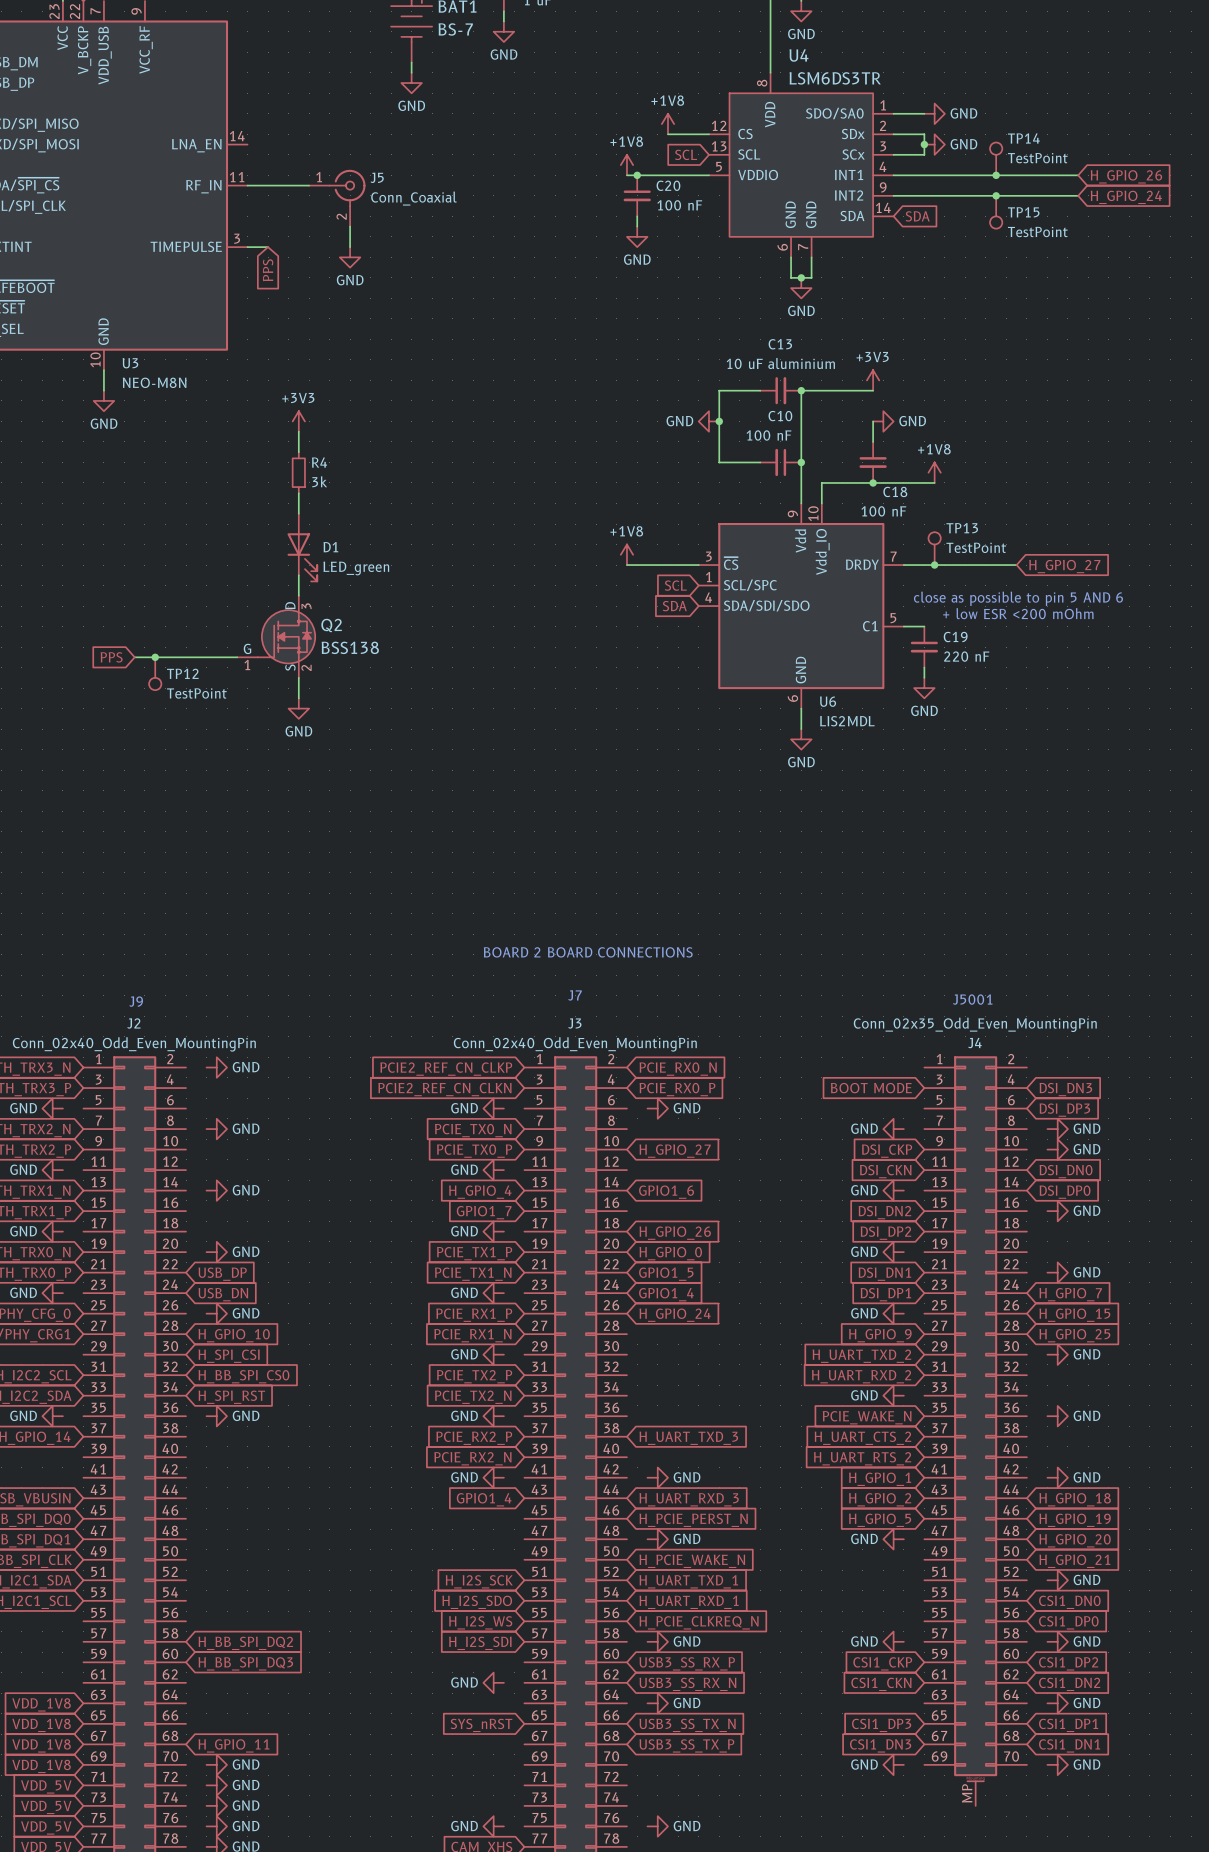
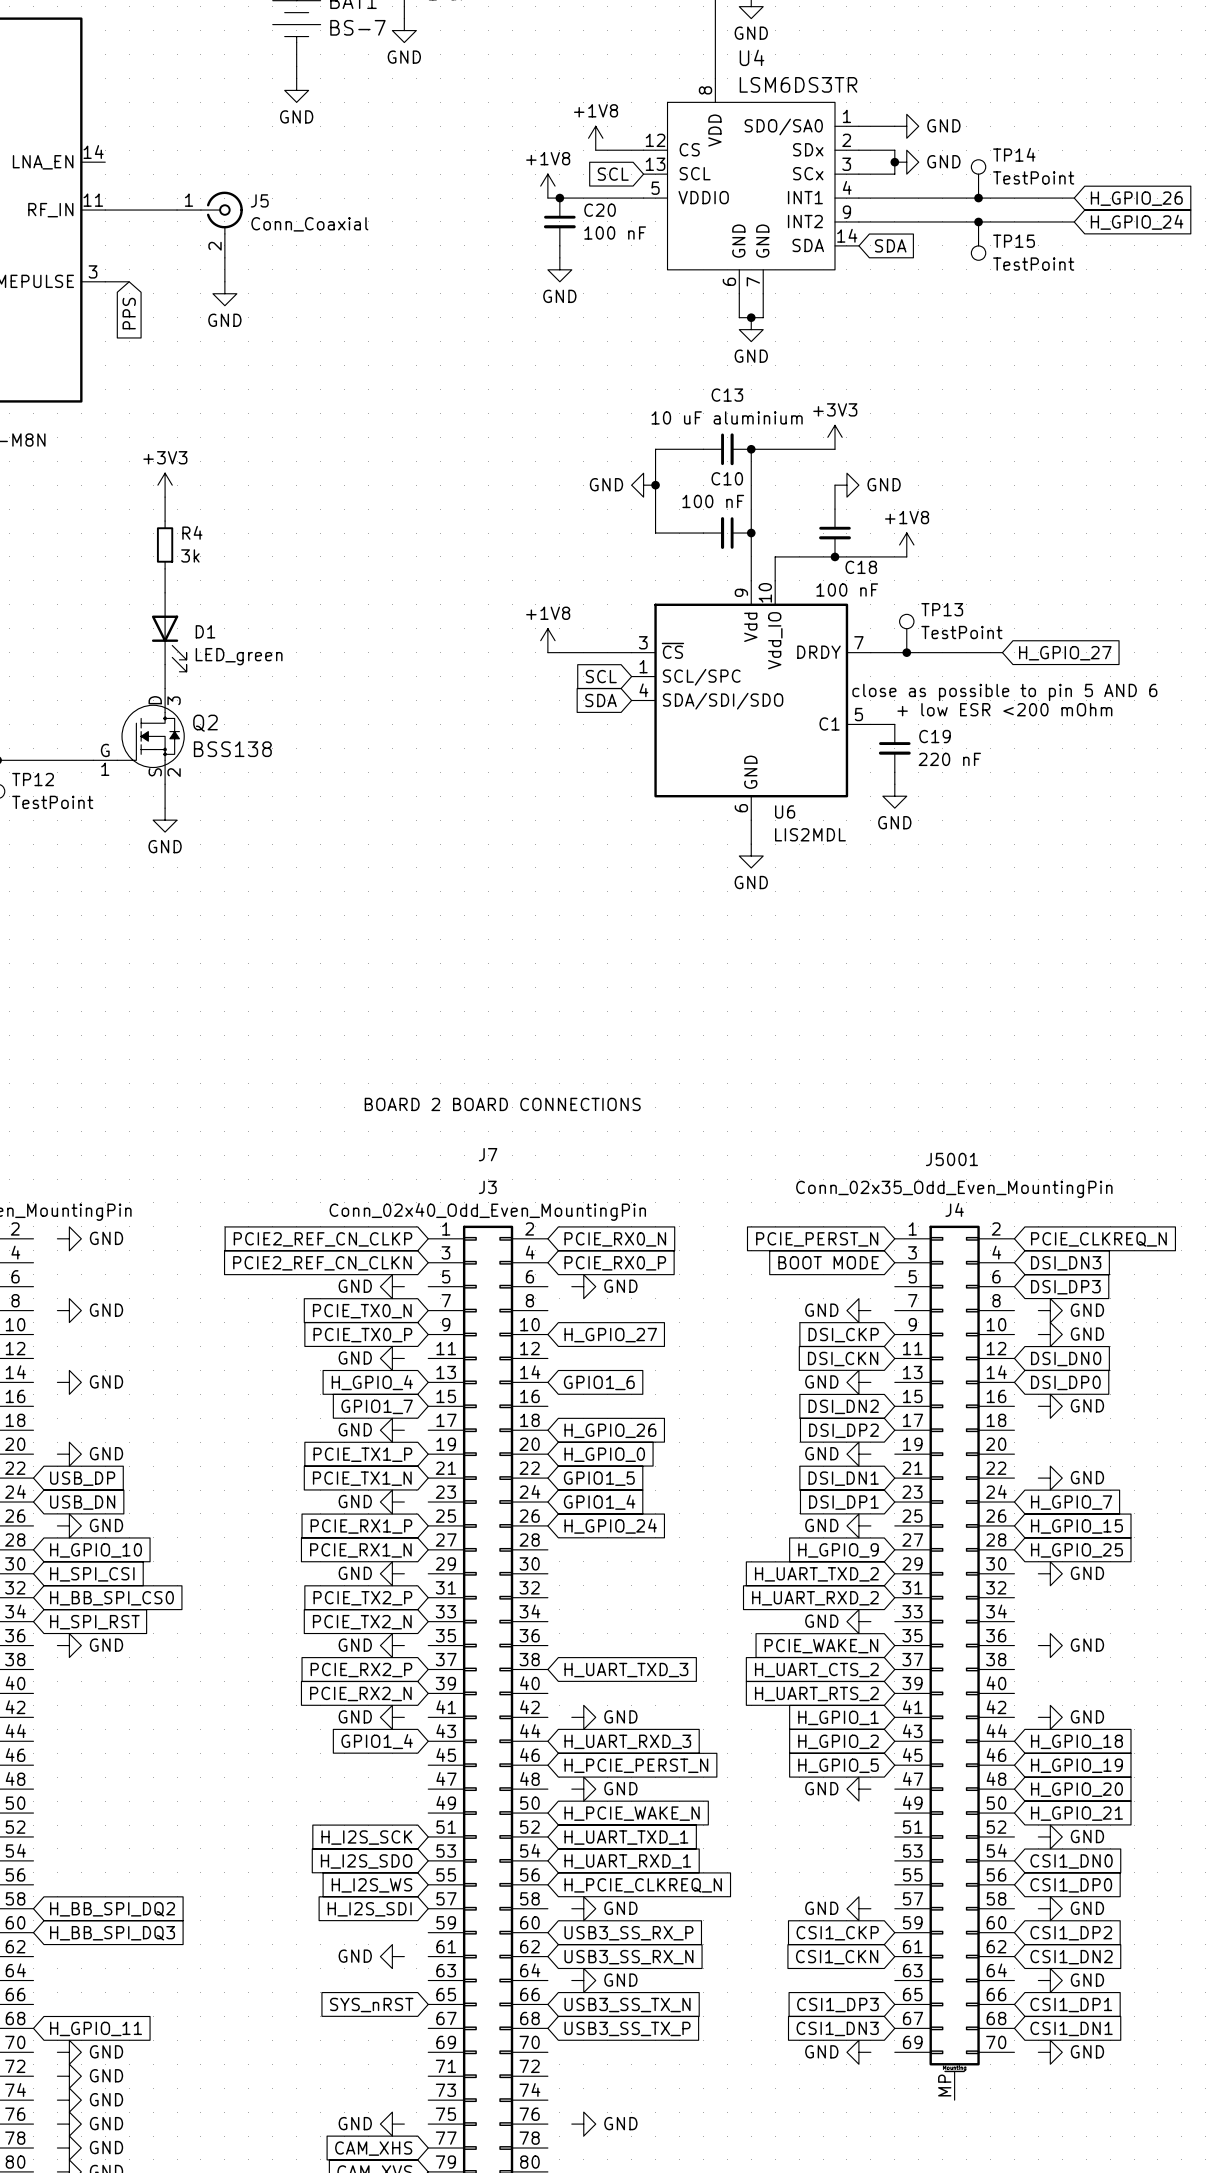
global label: none -> PCIE_PERST_N (817, 1239)
global label: none -> PCIE_CLKREQ_N (1098, 1239)

